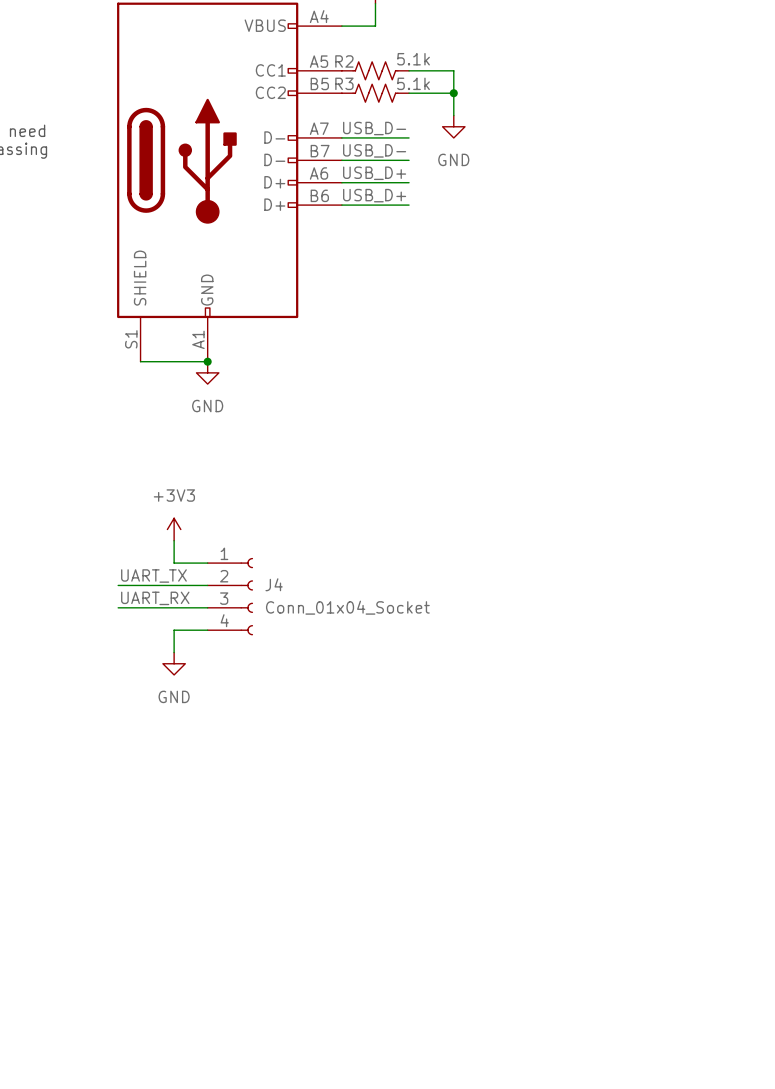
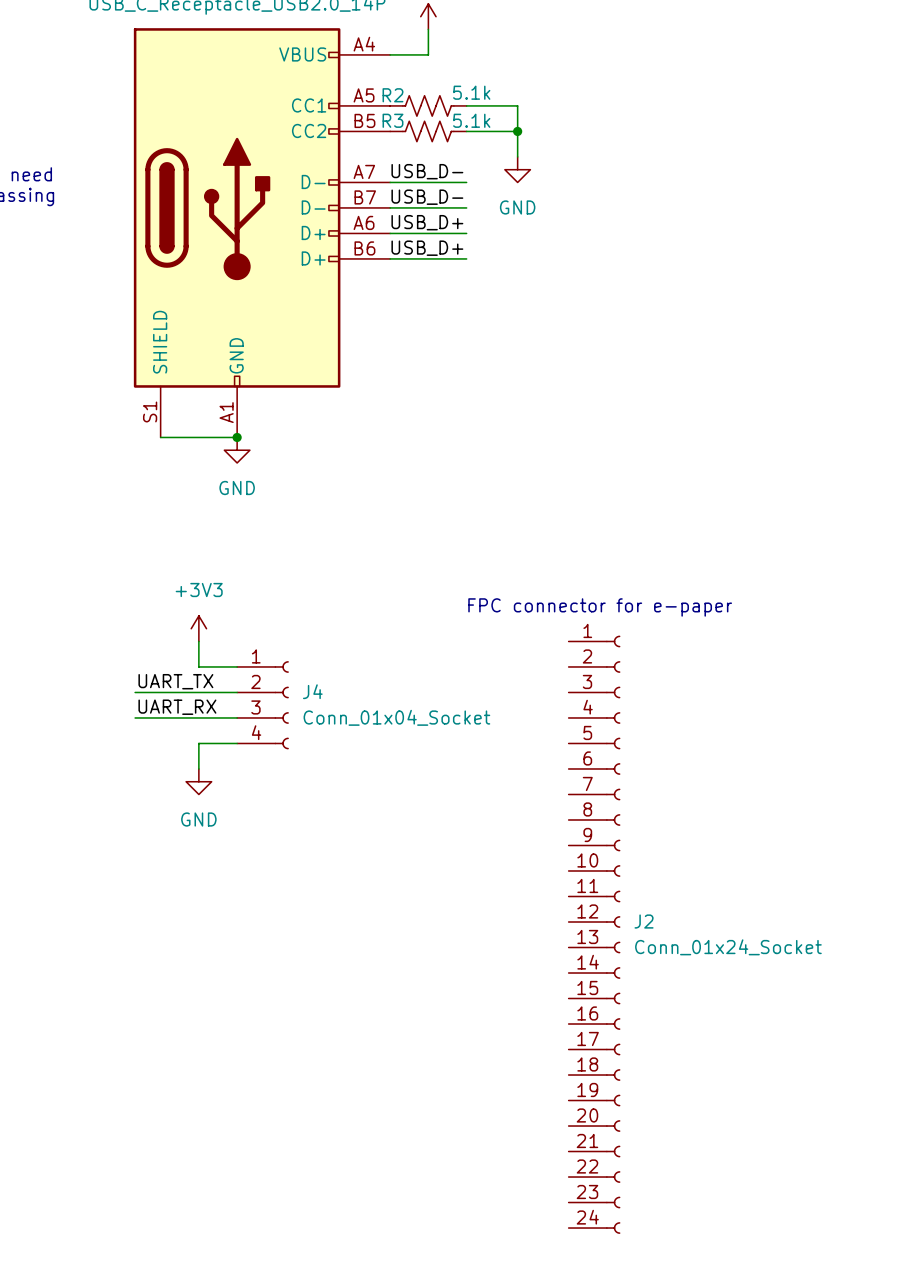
text: none -> FPC connector for e-paper (600, 607)
J2: none -> Conn_01x24_Socket (594, 934)

